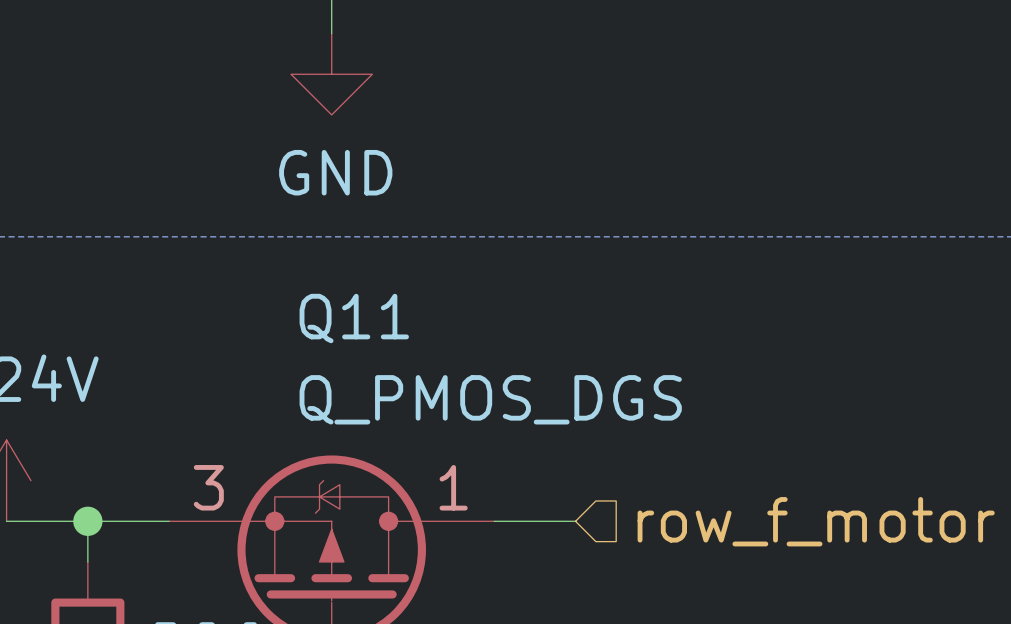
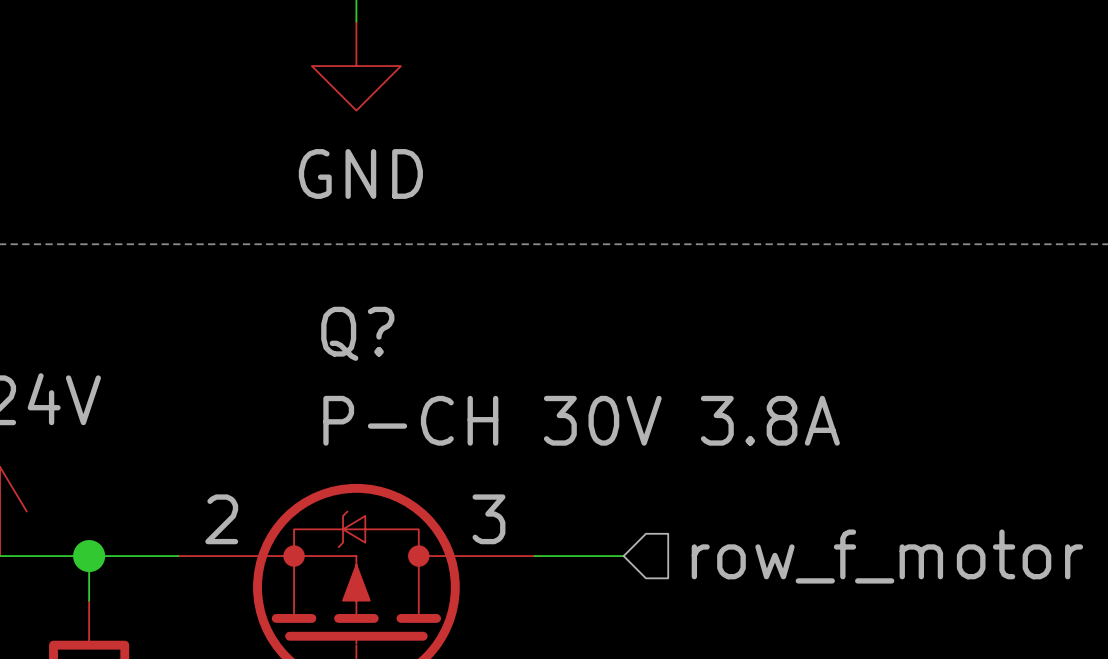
Q11 name: Q11 (354, 318) -> Q? (357, 333)
Q11 value: Q_PMOS_DGS (490, 399) -> P-CH 30V 3.8A (581, 420)
Q11 pin number: 3 (208, 487) -> 2 (221, 519)
Q11 pin number: 1 (453, 487) -> 3 (488, 519)

